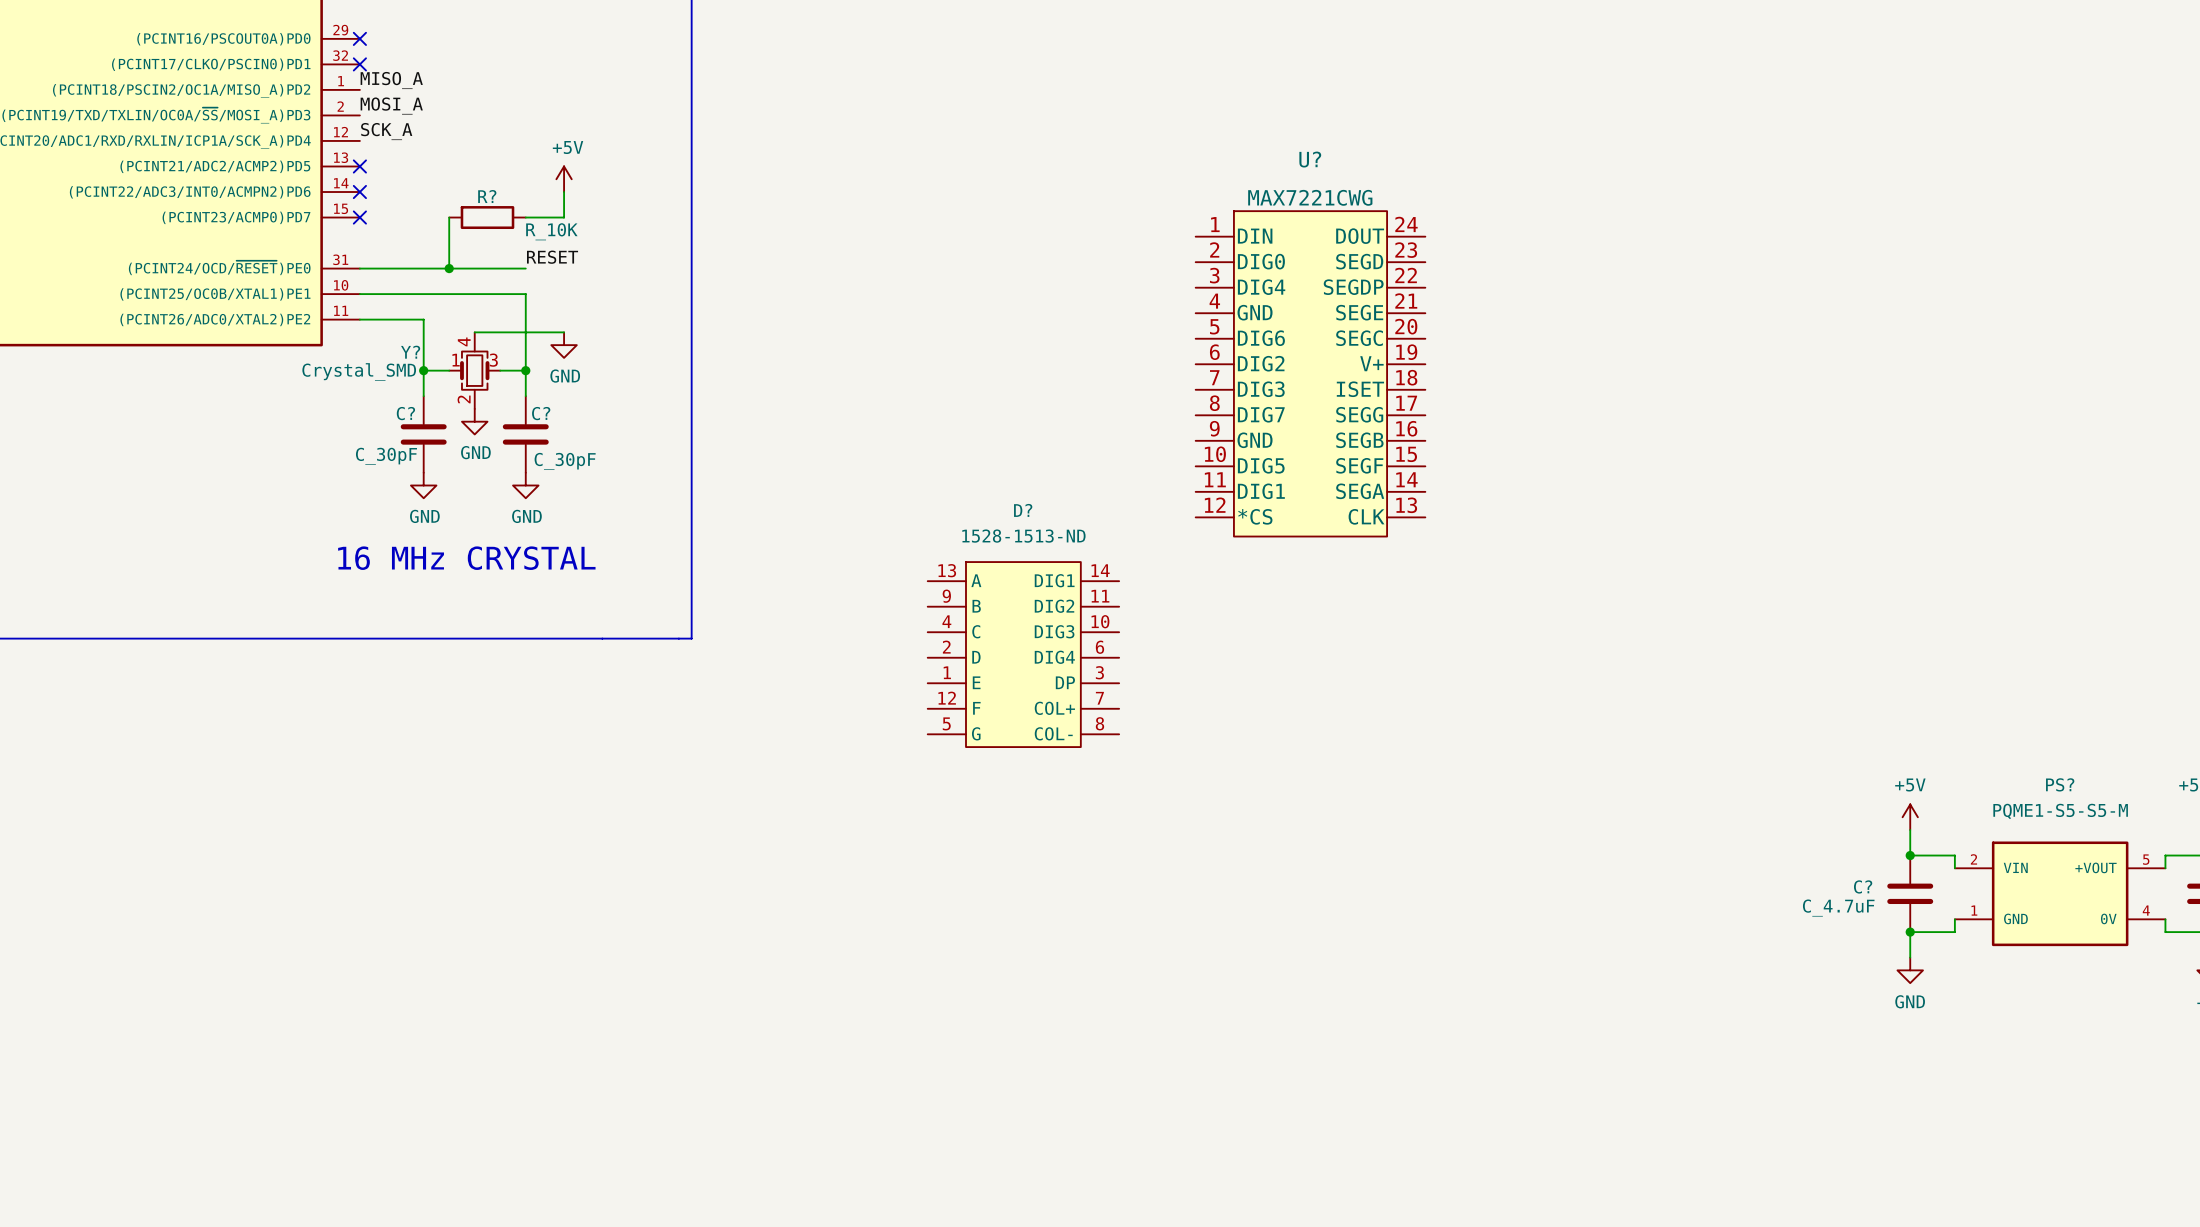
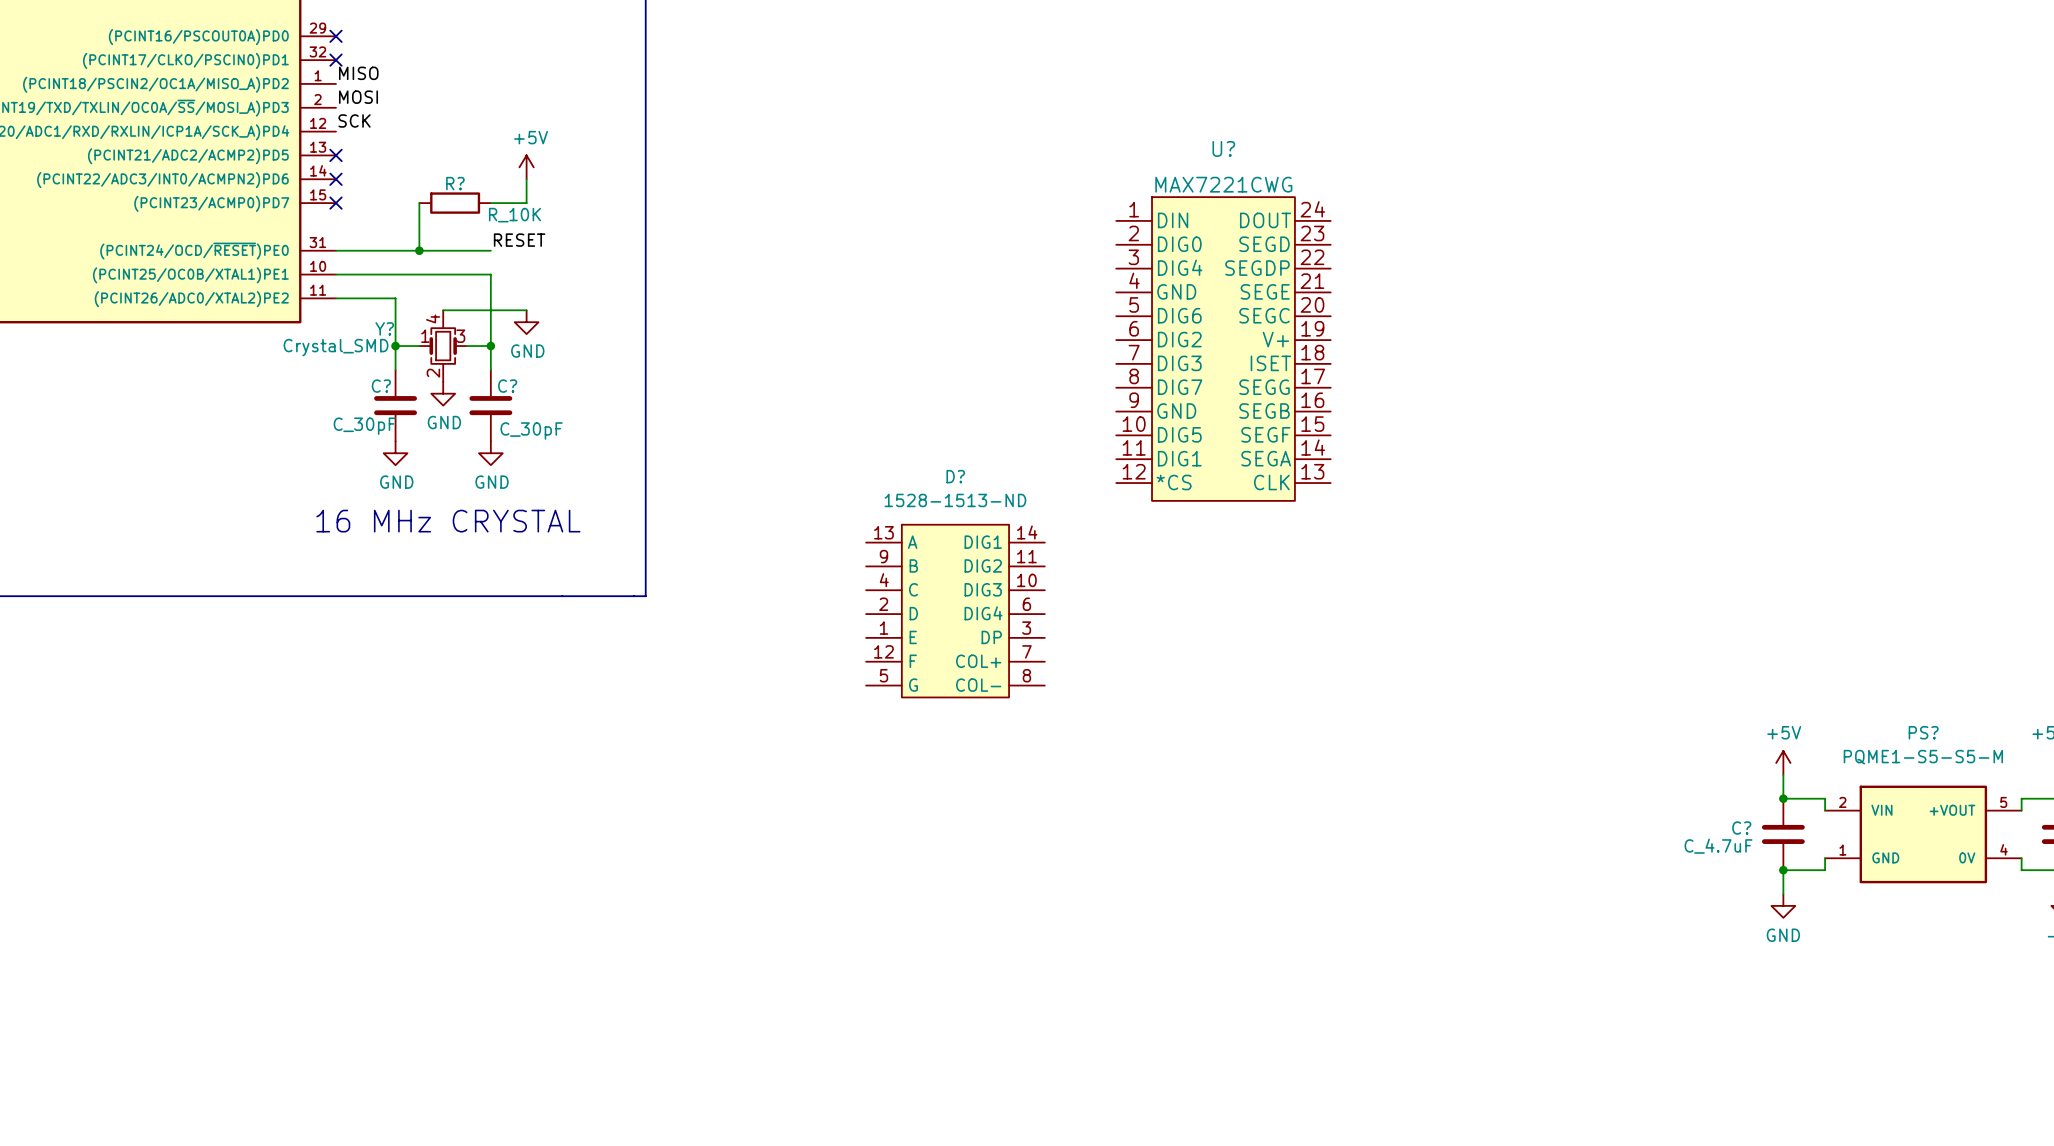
label: MISO_A (391, 80) -> MISO (358, 73)
label: MOSI_A (391, 106) -> MOSI (358, 97)
label: SCK_A (386, 131) -> SCK (354, 120)

